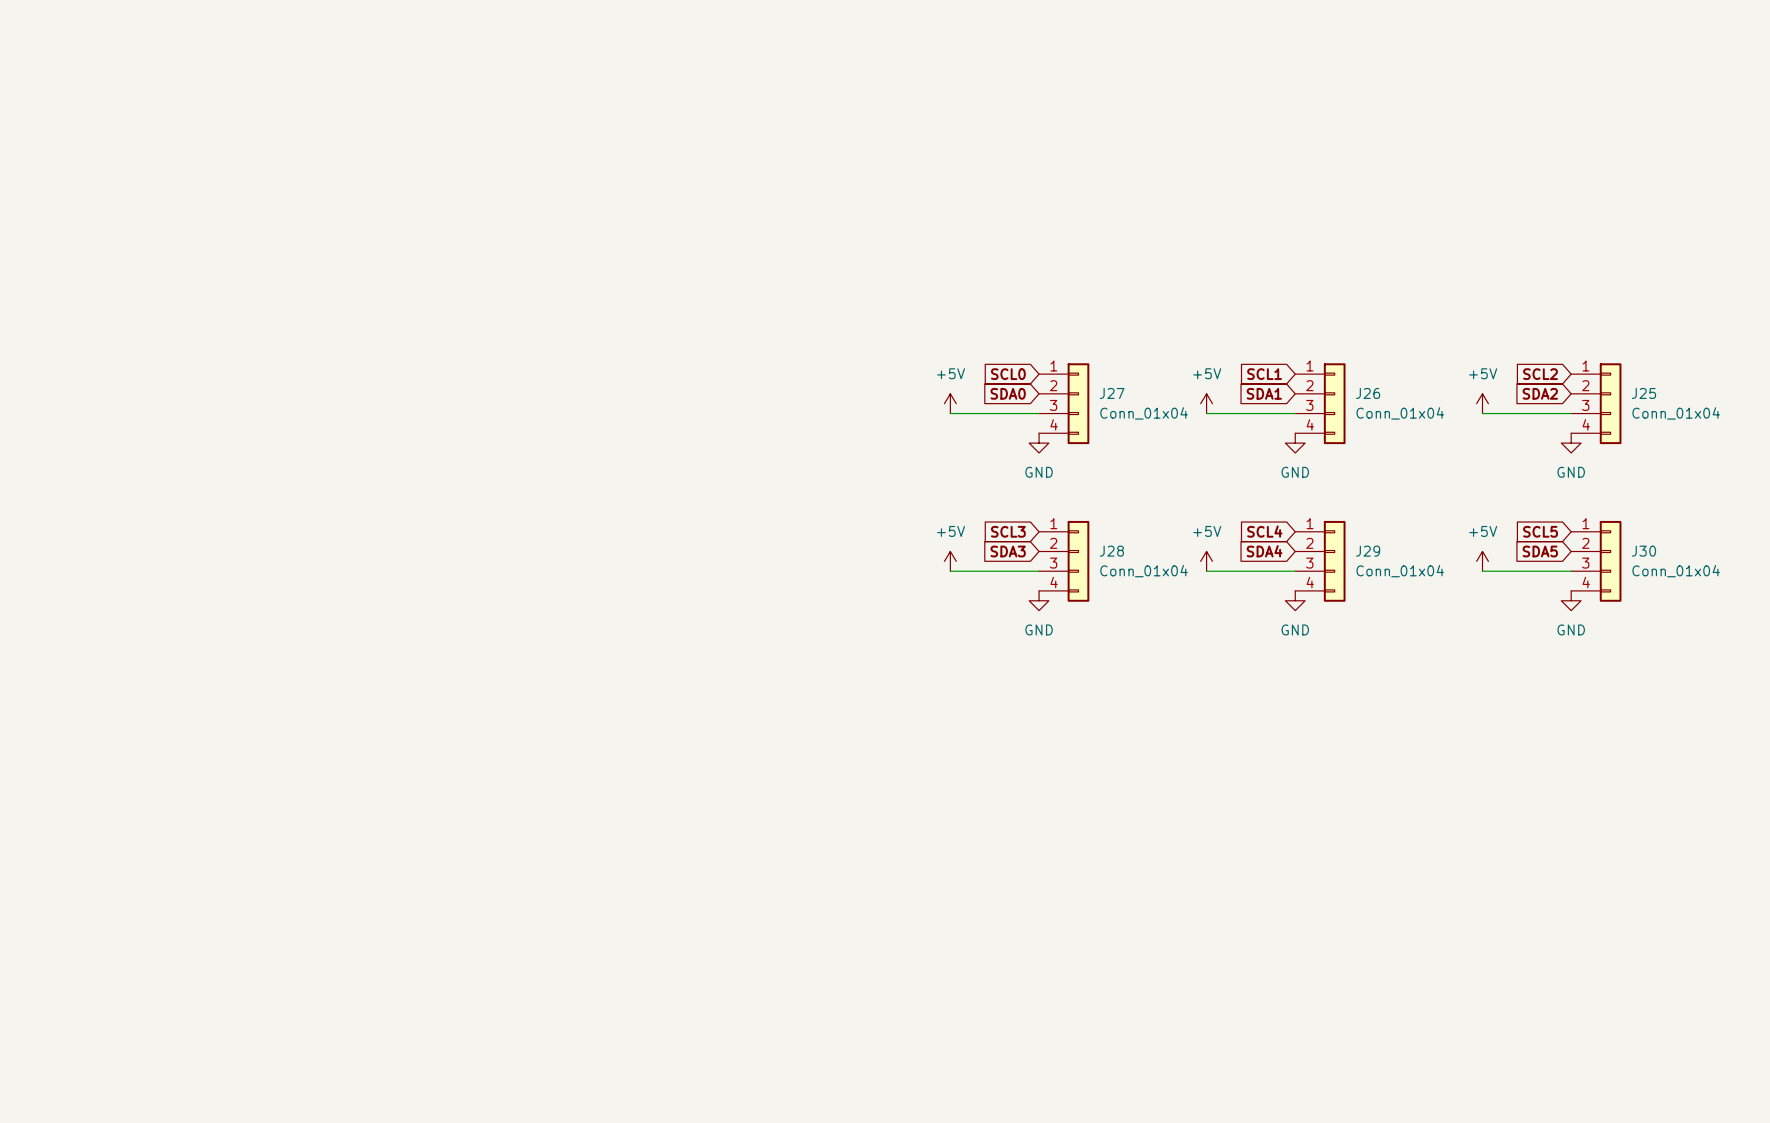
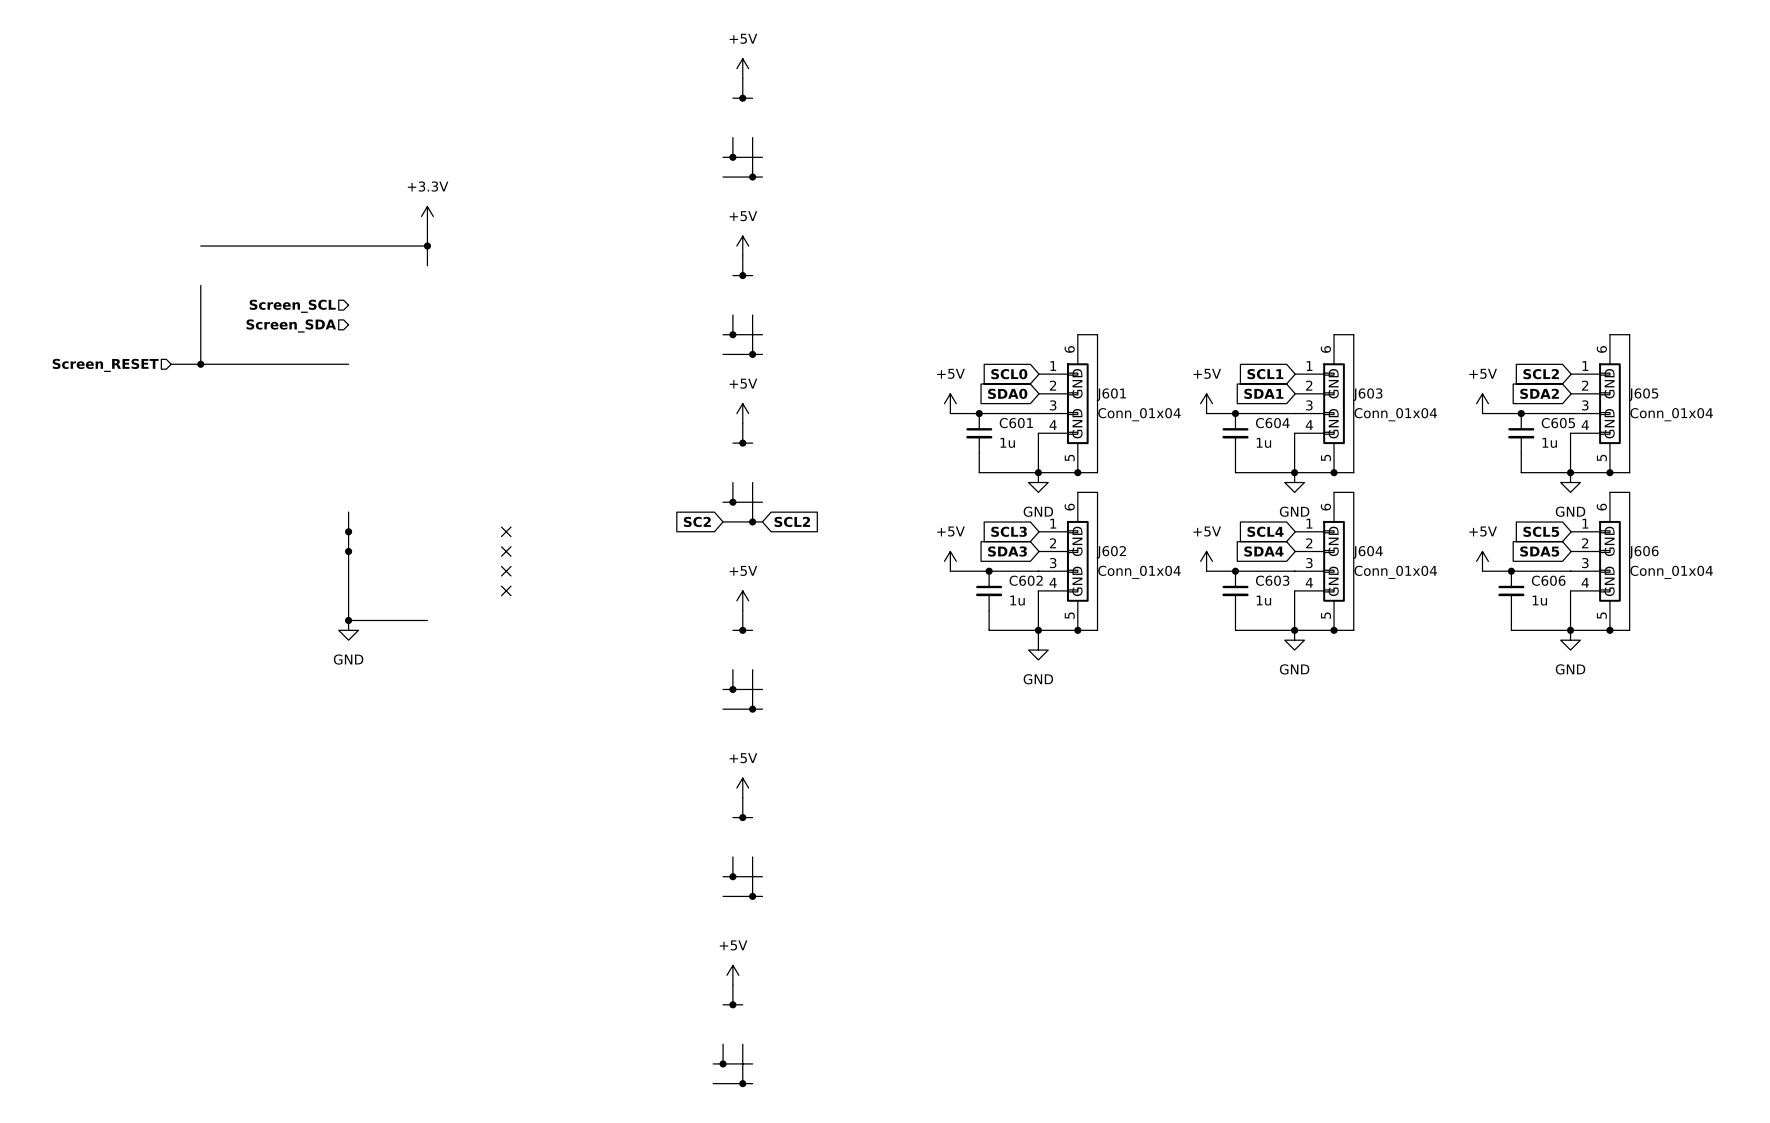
power symbol: none -> +5V (742, 68)
wire: none -> (742, 78) (742, 98)
wire: none -> (732, 98) (752, 98)
junction: none -> (742, 98)
wire: none -> (732, 137) (732, 157)
wire: none -> (752, 137) (752, 177)
wire: none -> (723, 157) (762, 157)
junction: none -> (732, 157)
wire: none -> (723, 177) (762, 177)
junction: none -> (752, 177)
power symbol: none -> +3.3V (427, 216)
wire: none -> (427, 226) (427, 265)
wire: none -> (200, 246) (427, 246)
junction: none -> (427, 246)
power symbol: none -> +5V (742, 246)
wire: none -> (742, 255) (742, 275)
wire: none -> (732, 275) (752, 275)
junction: none -> (742, 275)
wire: none -> (200, 285) (200, 364)
hierarchical label: none -> Screen_SCL (292, 306)
wire: none -> (732, 315) (732, 334)
wire: none -> (752, 315) (752, 354)
hierarchical label: none -> Screen_SDA (291, 325)
wire: none -> (723, 334) (762, 334)
junction: none -> (732, 334)
wire: none -> (1077, 334) (1097, 334) (1097, 472) (979, 472) (979, 452)
wire: none -> (1334, 334) (1353, 334) (1353, 472) (1235, 472) (1235, 452)
wire: none -> (1609, 334) (1629, 334) (1629, 472) (1521, 472) (1521, 452)
wire: none -> (723, 354) (762, 354)
junction: none -> (752, 354)
hierarchical label: none -> Screen_RESET (105, 365)
wire: none -> (171, 364) (348, 364)
junction: none -> (200, 364)
J601: none -> Conn_01x04 (1063, 403)
J27: Conn_01x04 (1064, 403) -> none
J603: none -> Conn_01x04 (1319, 403)
J26: Conn_01x04 (1320, 403) -> none
J605: none -> Conn_01x04 (1595, 403)
J25: Conn_01x04 (1596, 403) -> none
power symbol: none -> +5V (742, 413)
junction: none -> (979, 413)
junction: none -> (1235, 413)
junction: none -> (1521, 413)
wire: none -> (742, 423) (742, 443)
C601: none -> 1u (979, 433)
wire: none -> (1038, 433) (1038, 472)
C604: none -> 1u (1235, 433)
wire: none -> (1294, 433) (1294, 472)
C605: none -> 1u (1521, 433)
wire: none -> (1570, 433) (1570, 472)
wire: none -> (732, 443) (752, 443)
junction: none -> (742, 443)
power symbol position: GND (1039, 443) -> GND (1038, 482)
power symbol position: GND (1295, 443) -> GND (1294, 482)
power symbol position: GND (1571, 443) -> GND (1570, 482)
junction: none -> (1038, 472)
junction: none -> (1077, 472)
junction: none -> (1294, 472)
junction: none -> (1334, 472)
junction: none -> (1570, 472)
junction: none -> (1609, 472)
wire: none -> (732, 482) (732, 502)
wire: none -> (752, 482) (752, 521)
wire: none -> (1077, 492) (1097, 492) (1097, 630) (989, 630) (989, 610)
wire: none -> (1334, 492) (1353, 492) (1353, 630) (1235, 630) (1235, 610)
wire: none -> (1609, 492) (1629, 492) (1629, 630) (1511, 630) (1511, 610)
wire: none -> (723, 502) (762, 502)
junction: none -> (732, 502)
wire: none -> (348, 512) (348, 620) (427, 620)
global label: none -> SC2 (697, 521)
wire: none -> (723, 521) (762, 521)
junction: none -> (752, 521)
global label: none -> SCL2 (792, 521)
junction: none -> (348, 531)
no-connect mark: none -> (506, 531)
junction: none -> (348, 551)
no-connect mark: none -> (506, 551)
J602: none -> Conn_01x04 (1063, 561)
J28: Conn_01x04 (1064, 561) -> none
J604: none -> Conn_01x04 (1319, 561)
J29: Conn_01x04 (1320, 561) -> none
J606: none -> Conn_01x04 (1595, 561)
J30: Conn_01x04 (1596, 561) -> none
no-connect mark: none -> (506, 571)
junction: none -> (989, 571)
junction: none -> (1235, 571)
junction: none -> (1511, 571)
no-connect mark: none -> (506, 590)
C602: none -> 1u (989, 590)
wire: none -> (1038, 590) (1038, 640)
C603: none -> 1u (1235, 590)
wire: none -> (1294, 590) (1294, 630)
C606: none -> 1u (1511, 590)
wire: none -> (1570, 590) (1570, 630)
power symbol: none -> +5V (742, 600)
power symbol position: GND (1039, 600) -> GND (1038, 650)
power symbol position: GND (1295, 600) -> GND (1294, 640)
power symbol position: GND (1571, 600) -> GND (1570, 640)
wire: none -> (742, 610) (742, 630)
junction: none -> (348, 620)
power symbol: none -> GND (348, 630)
wire: none -> (732, 630) (752, 630)
junction: none -> (742, 630)
junction: none -> (1038, 630)
junction: none -> (1077, 630)
junction: none -> (1294, 630)
junction: none -> (1334, 630)
junction: none -> (1570, 630)
junction: none -> (1609, 630)
wire: none -> (732, 669) (732, 689)
wire: none -> (752, 669) (752, 709)
wire: none -> (723, 689) (762, 689)
junction: none -> (732, 689)
wire: none -> (723, 709) (762, 709)
junction: none -> (752, 709)
power symbol: none -> +5V (742, 788)
wire: none -> (742, 797) (742, 817)
wire: none -> (732, 817) (752, 817)
junction: none -> (742, 817)
wire: none -> (732, 856) (732, 876)
wire: none -> (752, 856) (752, 896)
wire: none -> (723, 876) (762, 876)
junction: none -> (732, 876)
wire: none -> (723, 896) (762, 896)
junction: none -> (752, 896)
power symbol: none -> +5V (732, 975)
wire: none -> (732, 985) (732, 1004)
wire: none -> (723, 1004) (742, 1004)
junction: none -> (732, 1004)
wire: none -> (723, 1044) (723, 1063)
wire: none -> (742, 1044) (742, 1083)
wire: none -> (713, 1063) (752, 1063)
junction: none -> (723, 1063)
wire: none -> (713, 1083) (752, 1083)
junction: none -> (742, 1083)

